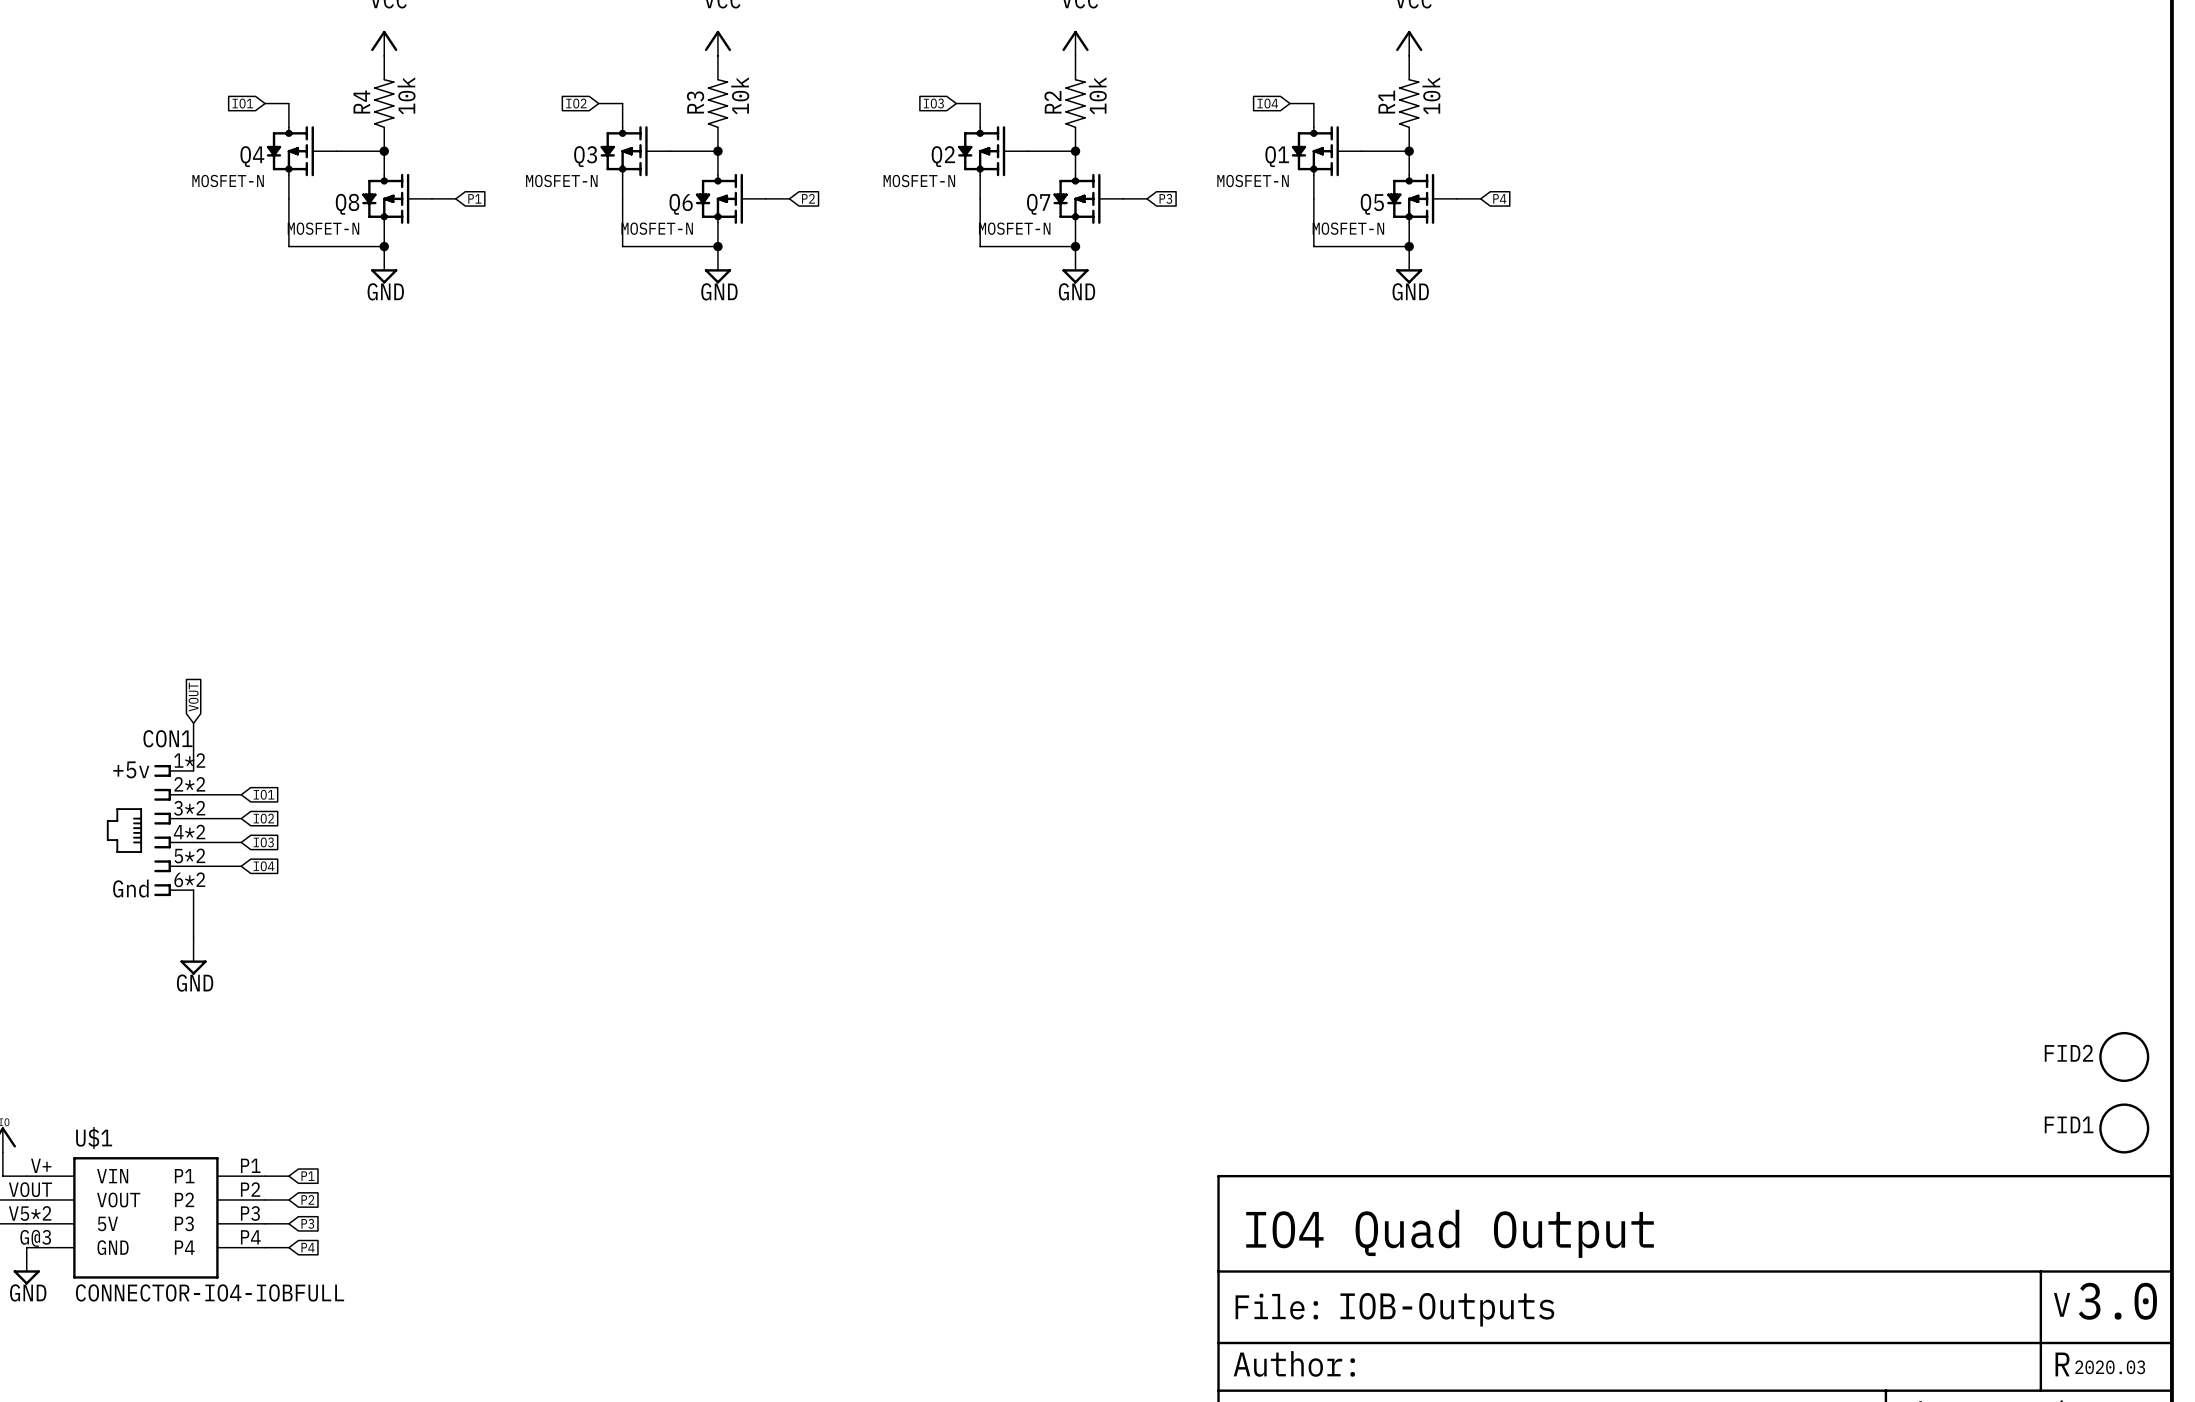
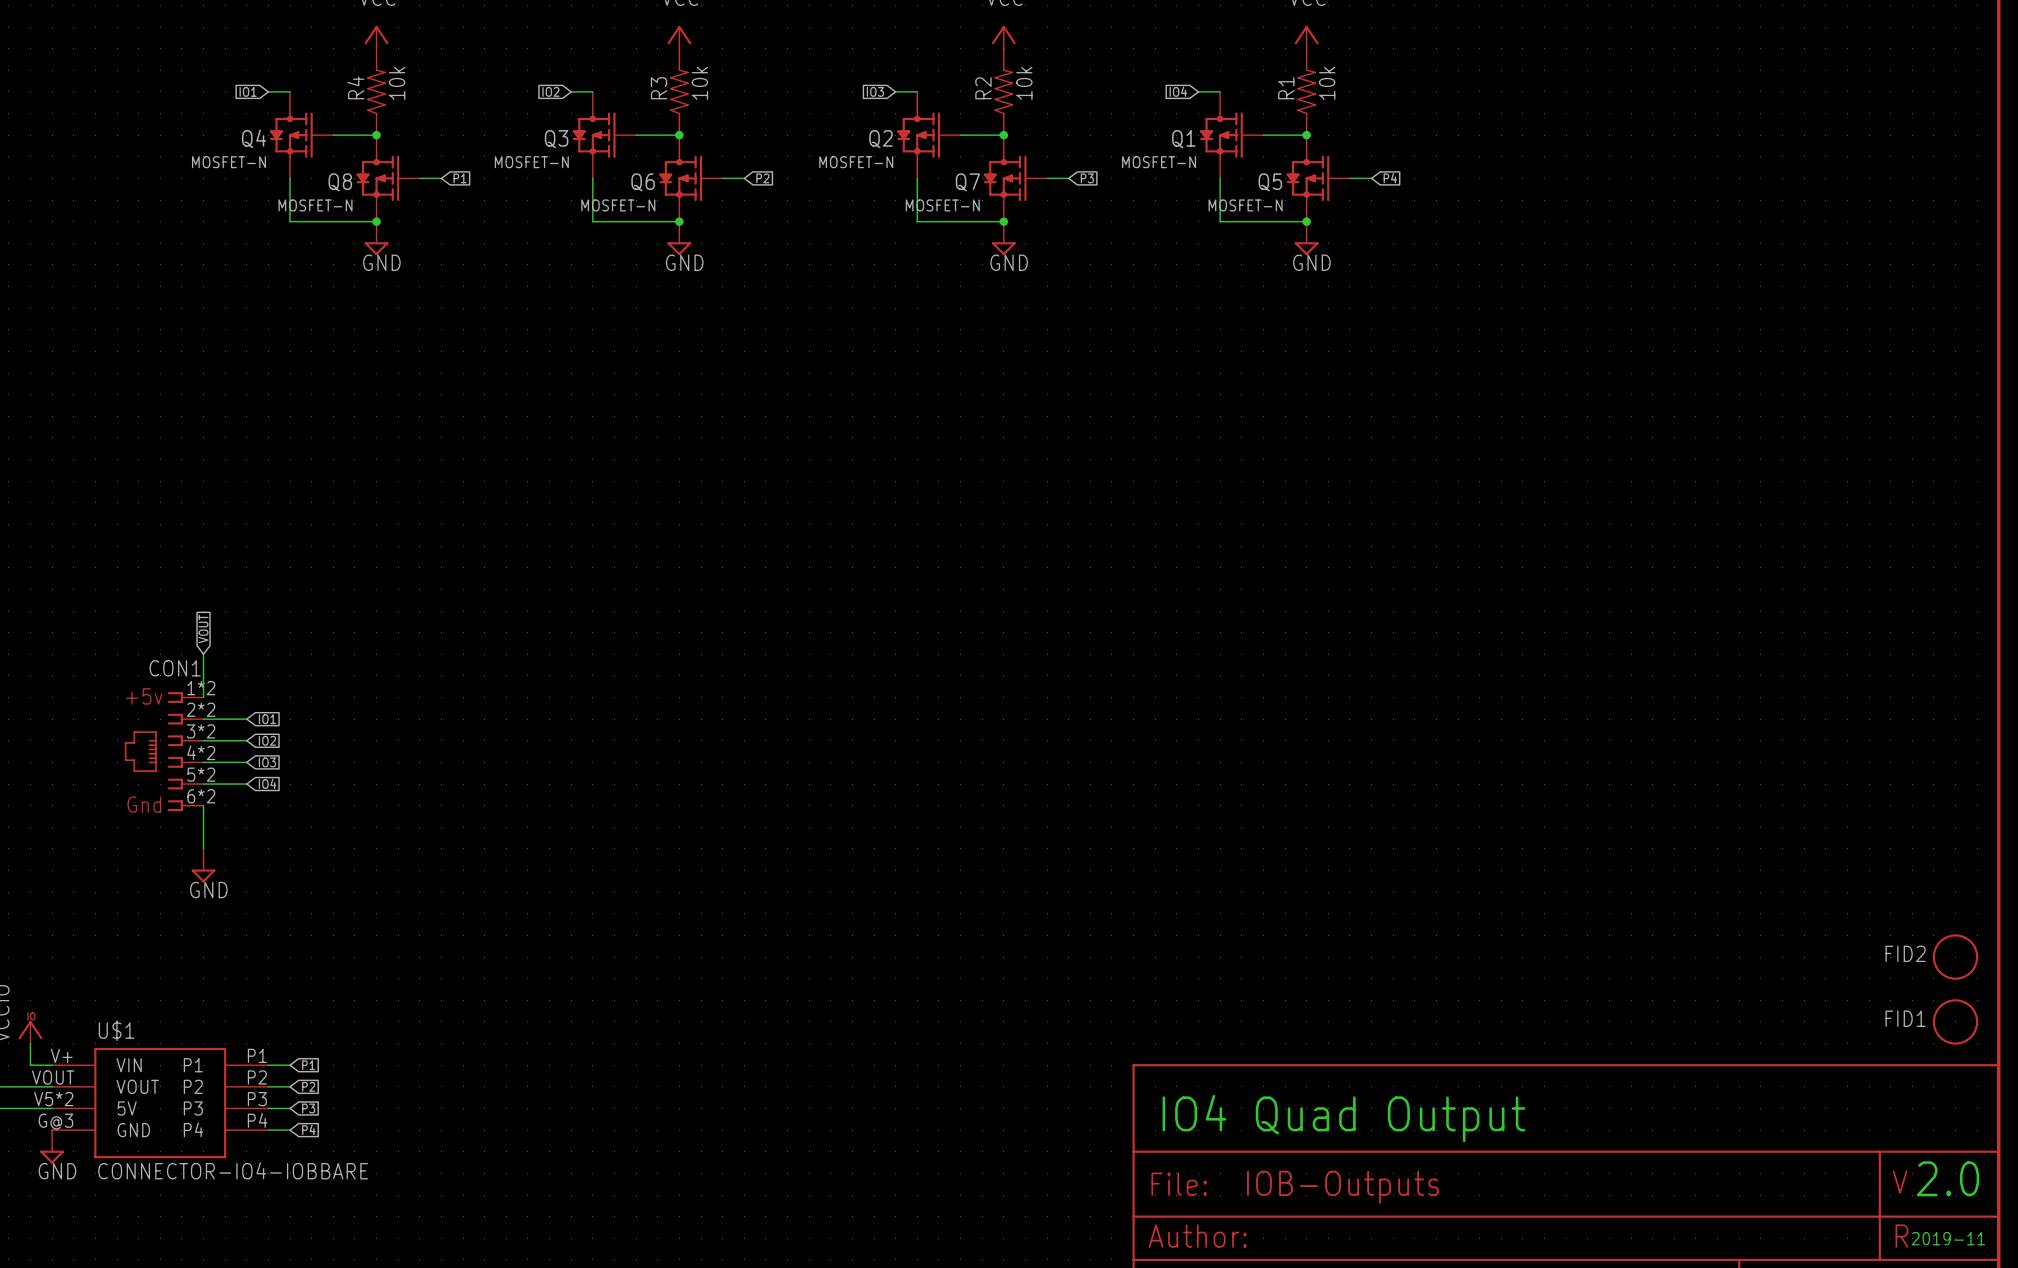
U$1 value: CONNECTOR-IO4-IOBFULL (209, 1292) -> CONNECTOR-IO4-IOBBARE (233, 1170)
text: 3.0 (2117, 1301) -> 2.0 (1948, 1178)
text: 2020.03 (2110, 1367) -> 2019-11 (1948, 1238)

